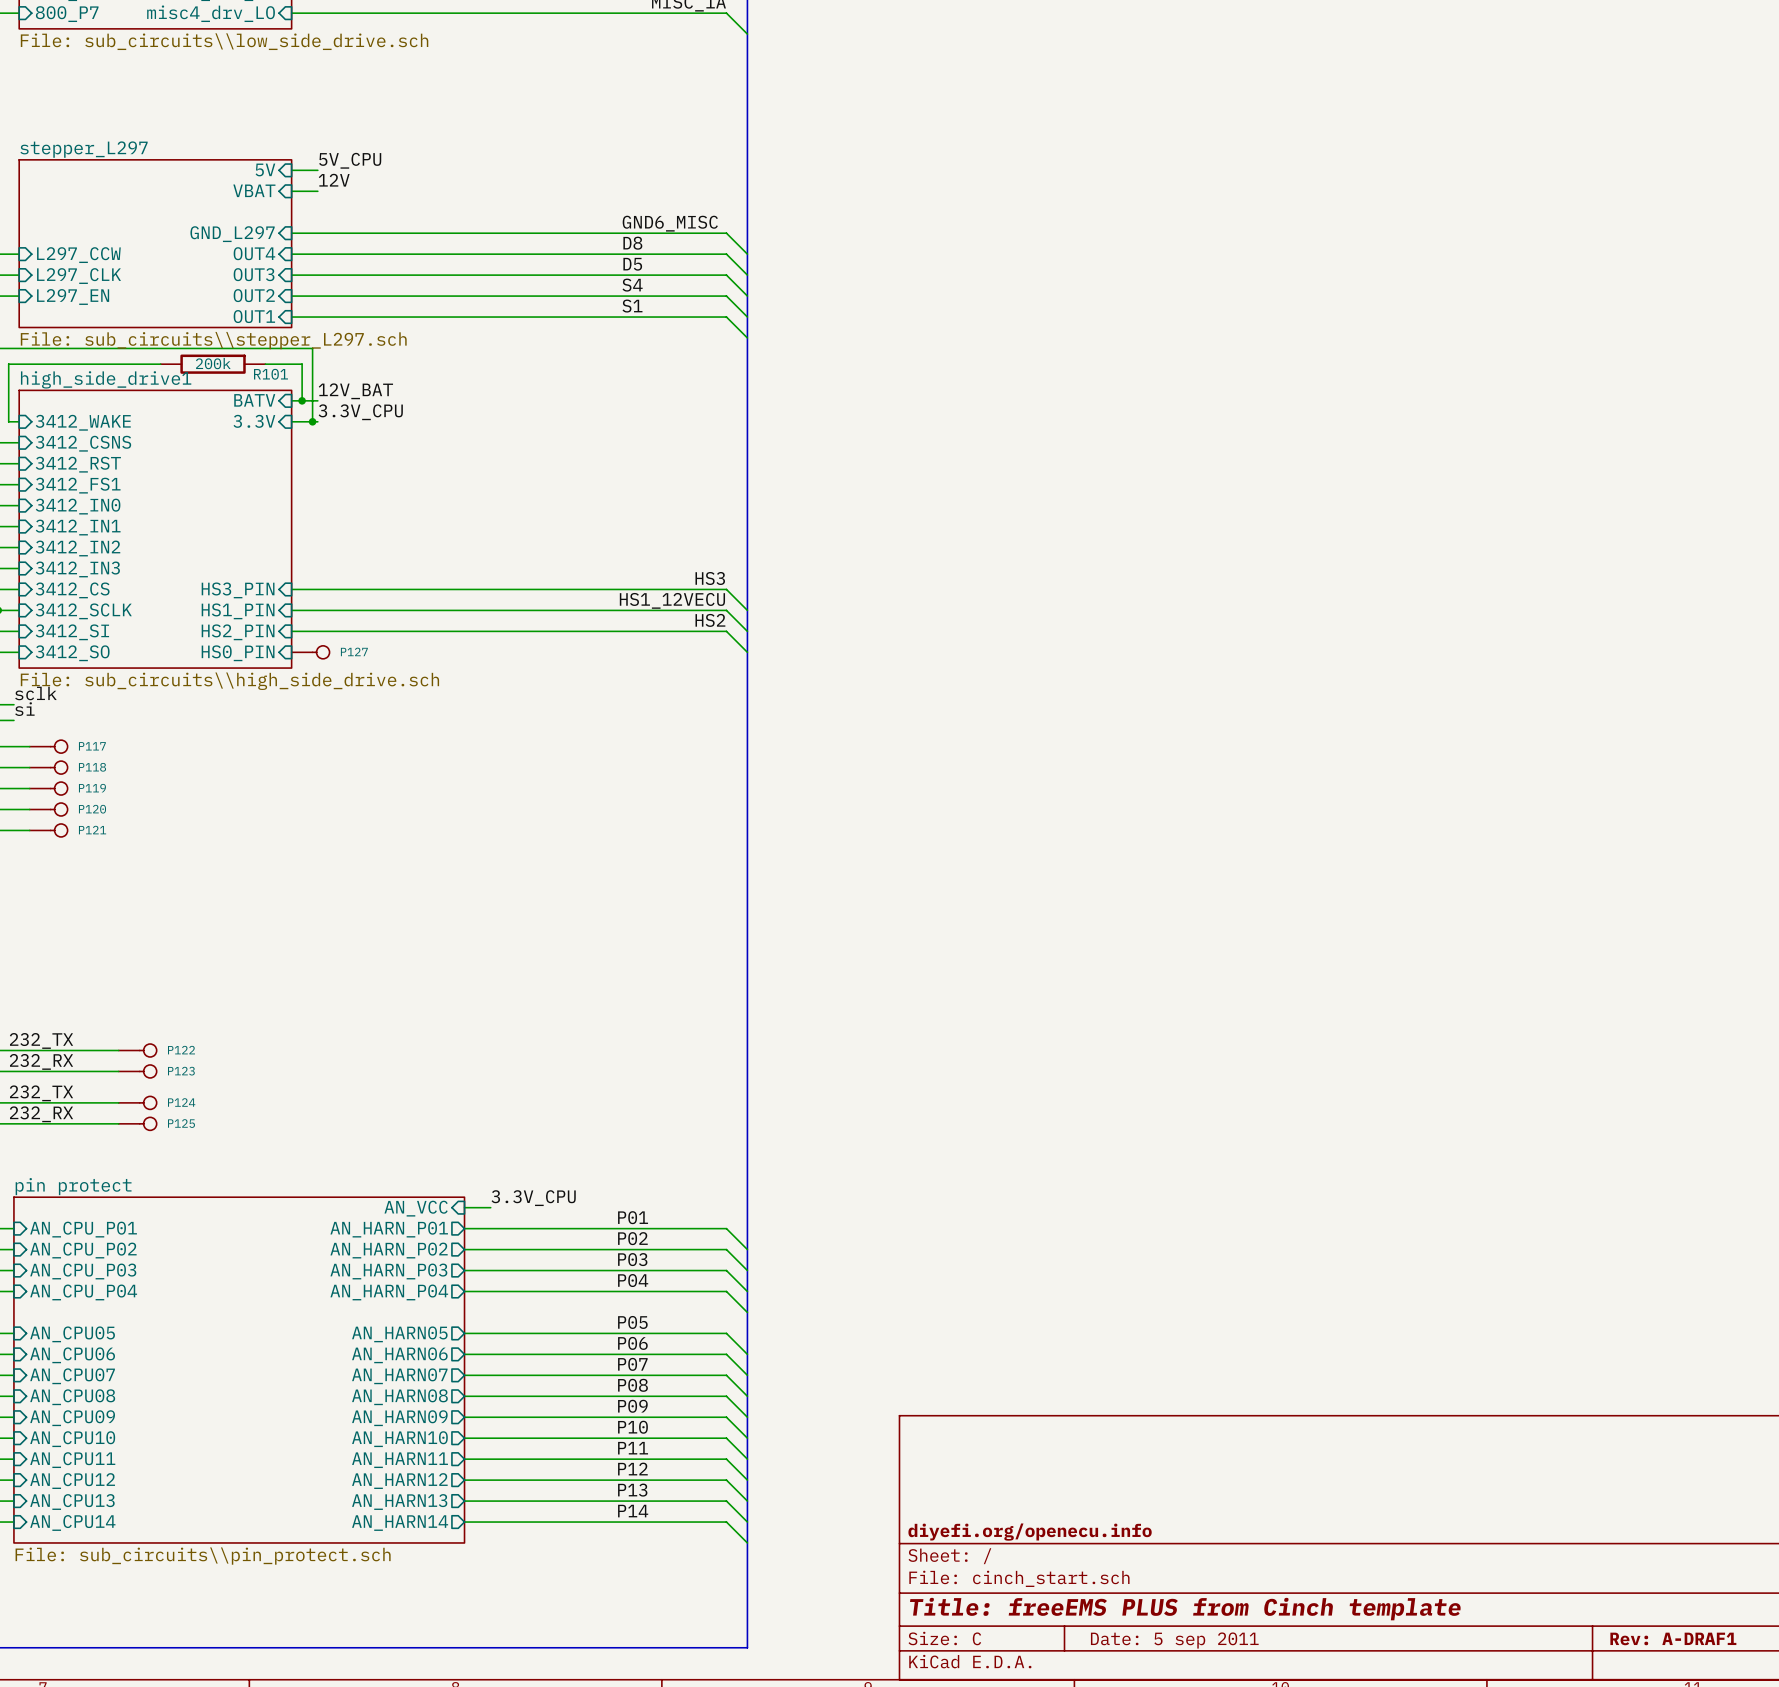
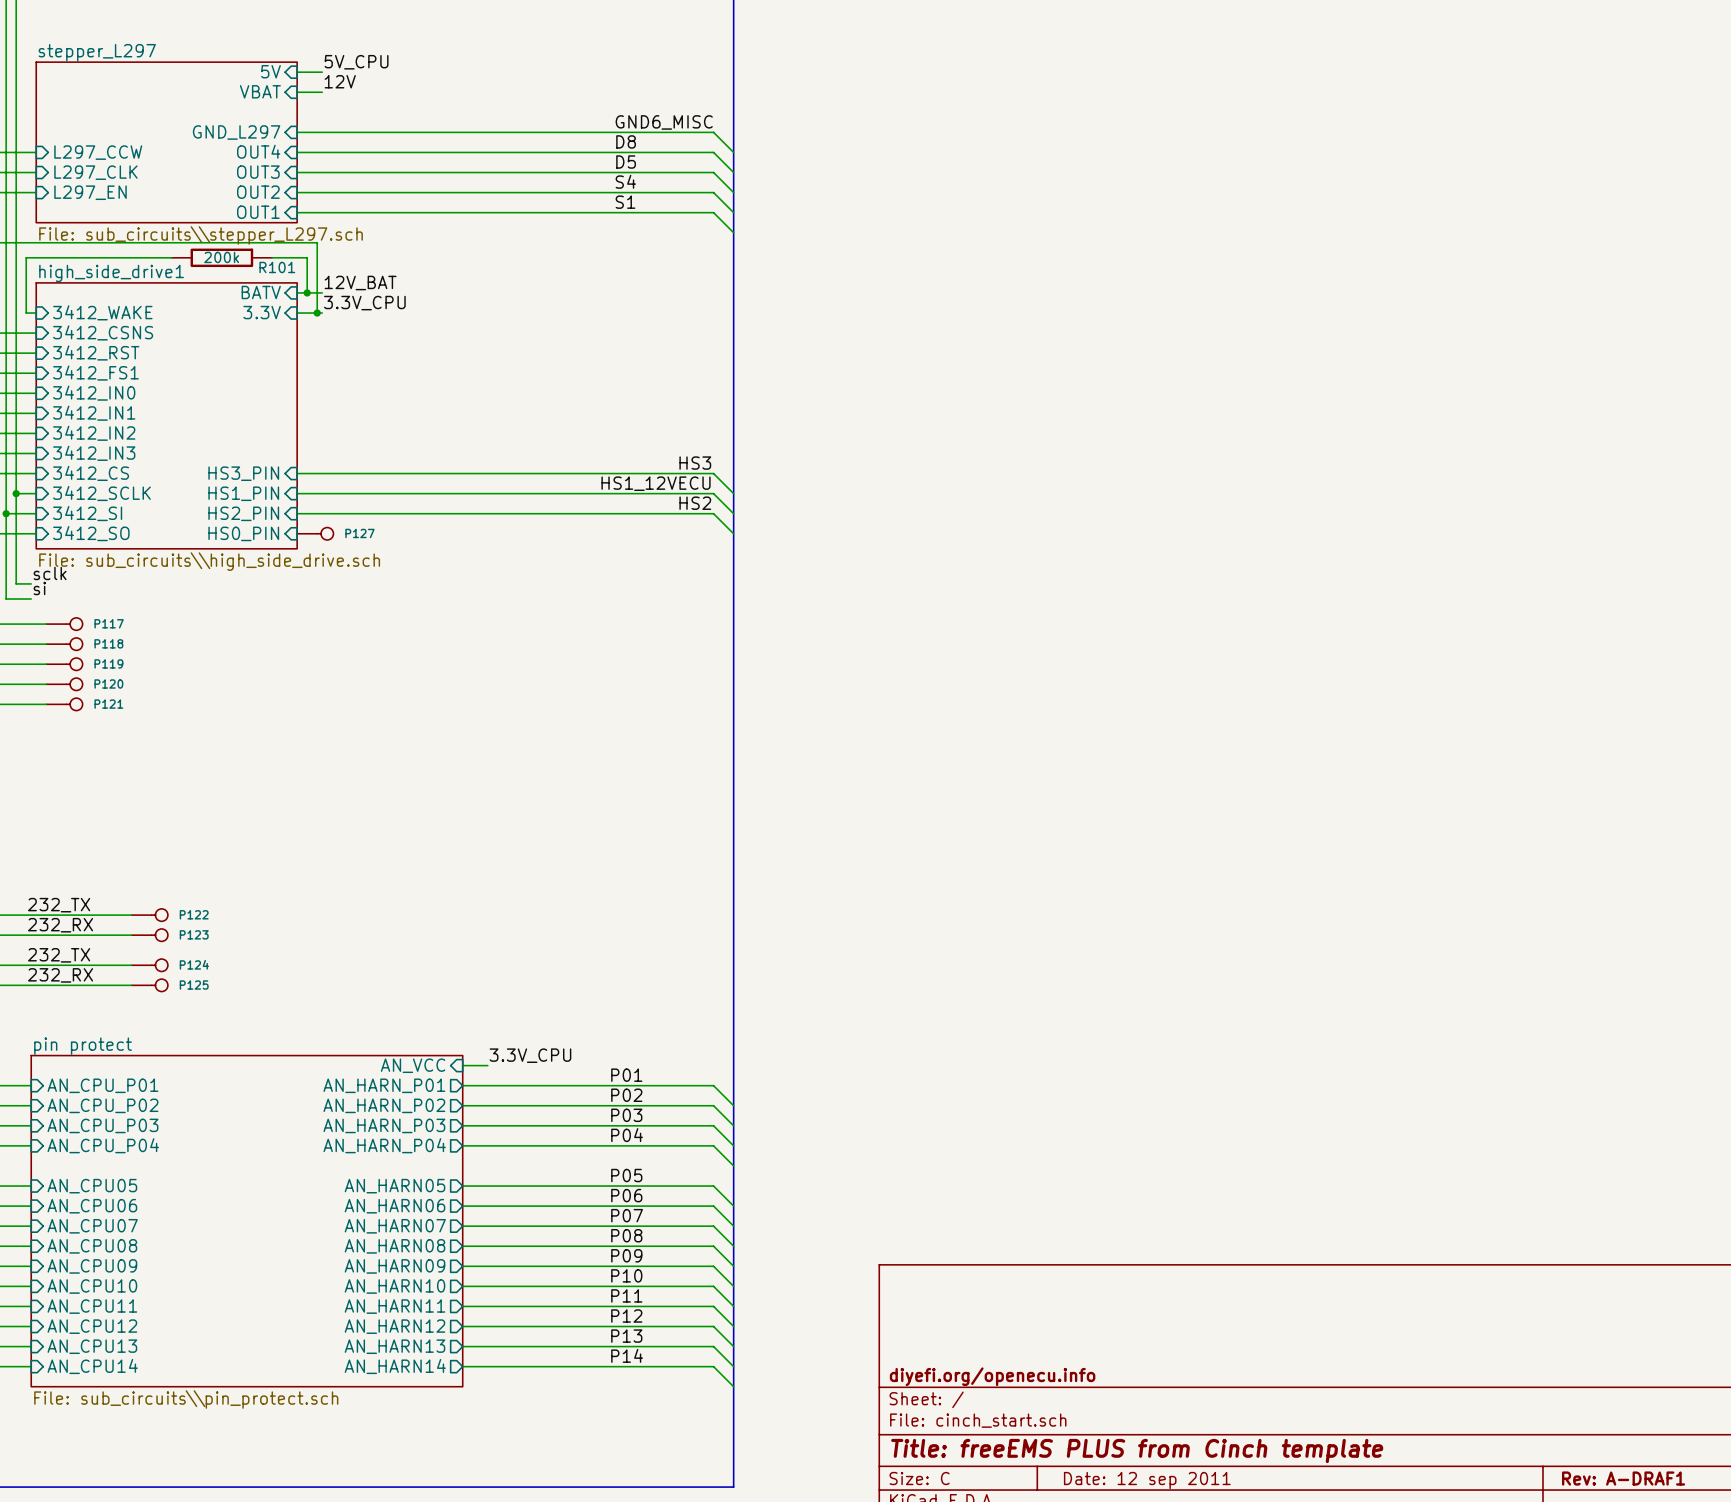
title block: Date: 5 sep 2011 (1174, 1640) -> Date: 12 sep 2011 (1147, 1480)

